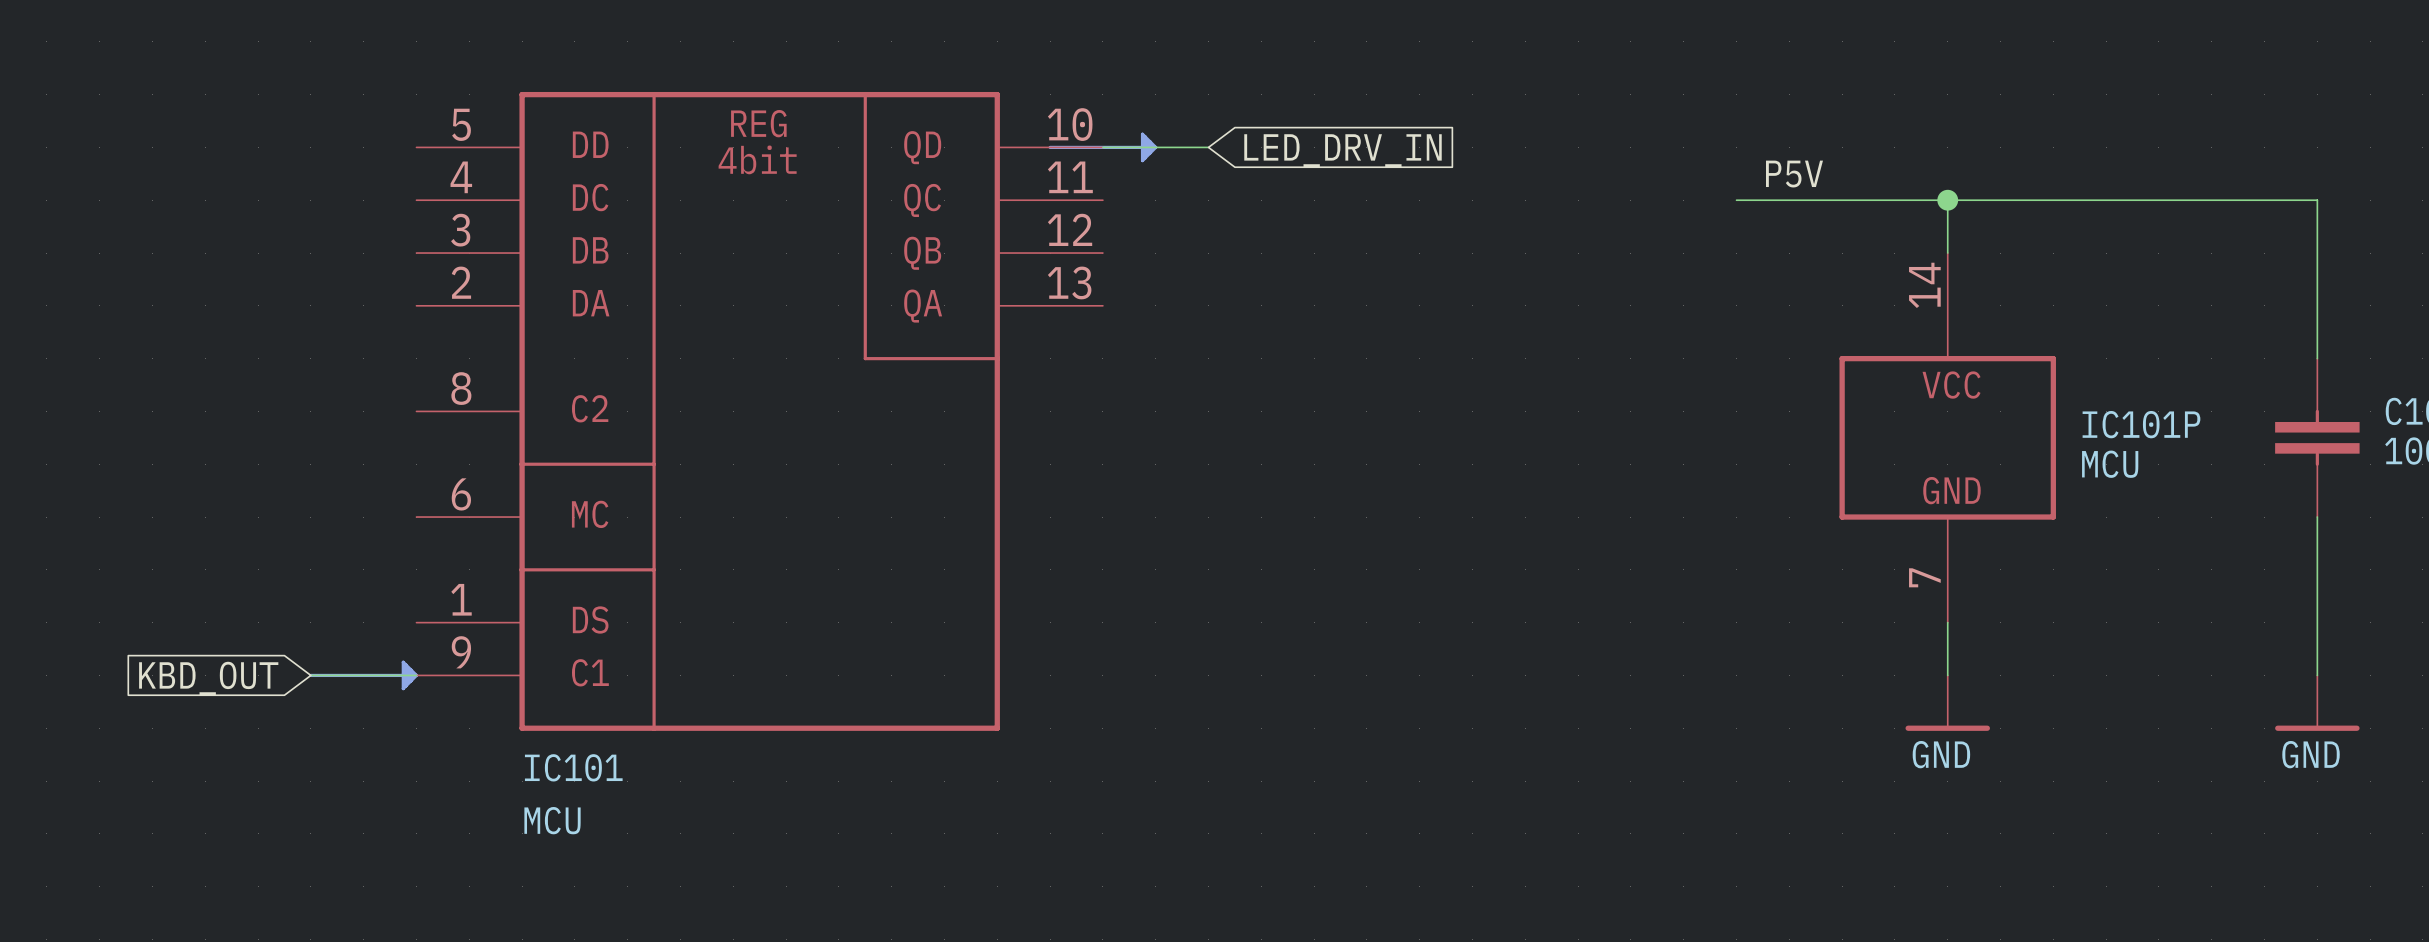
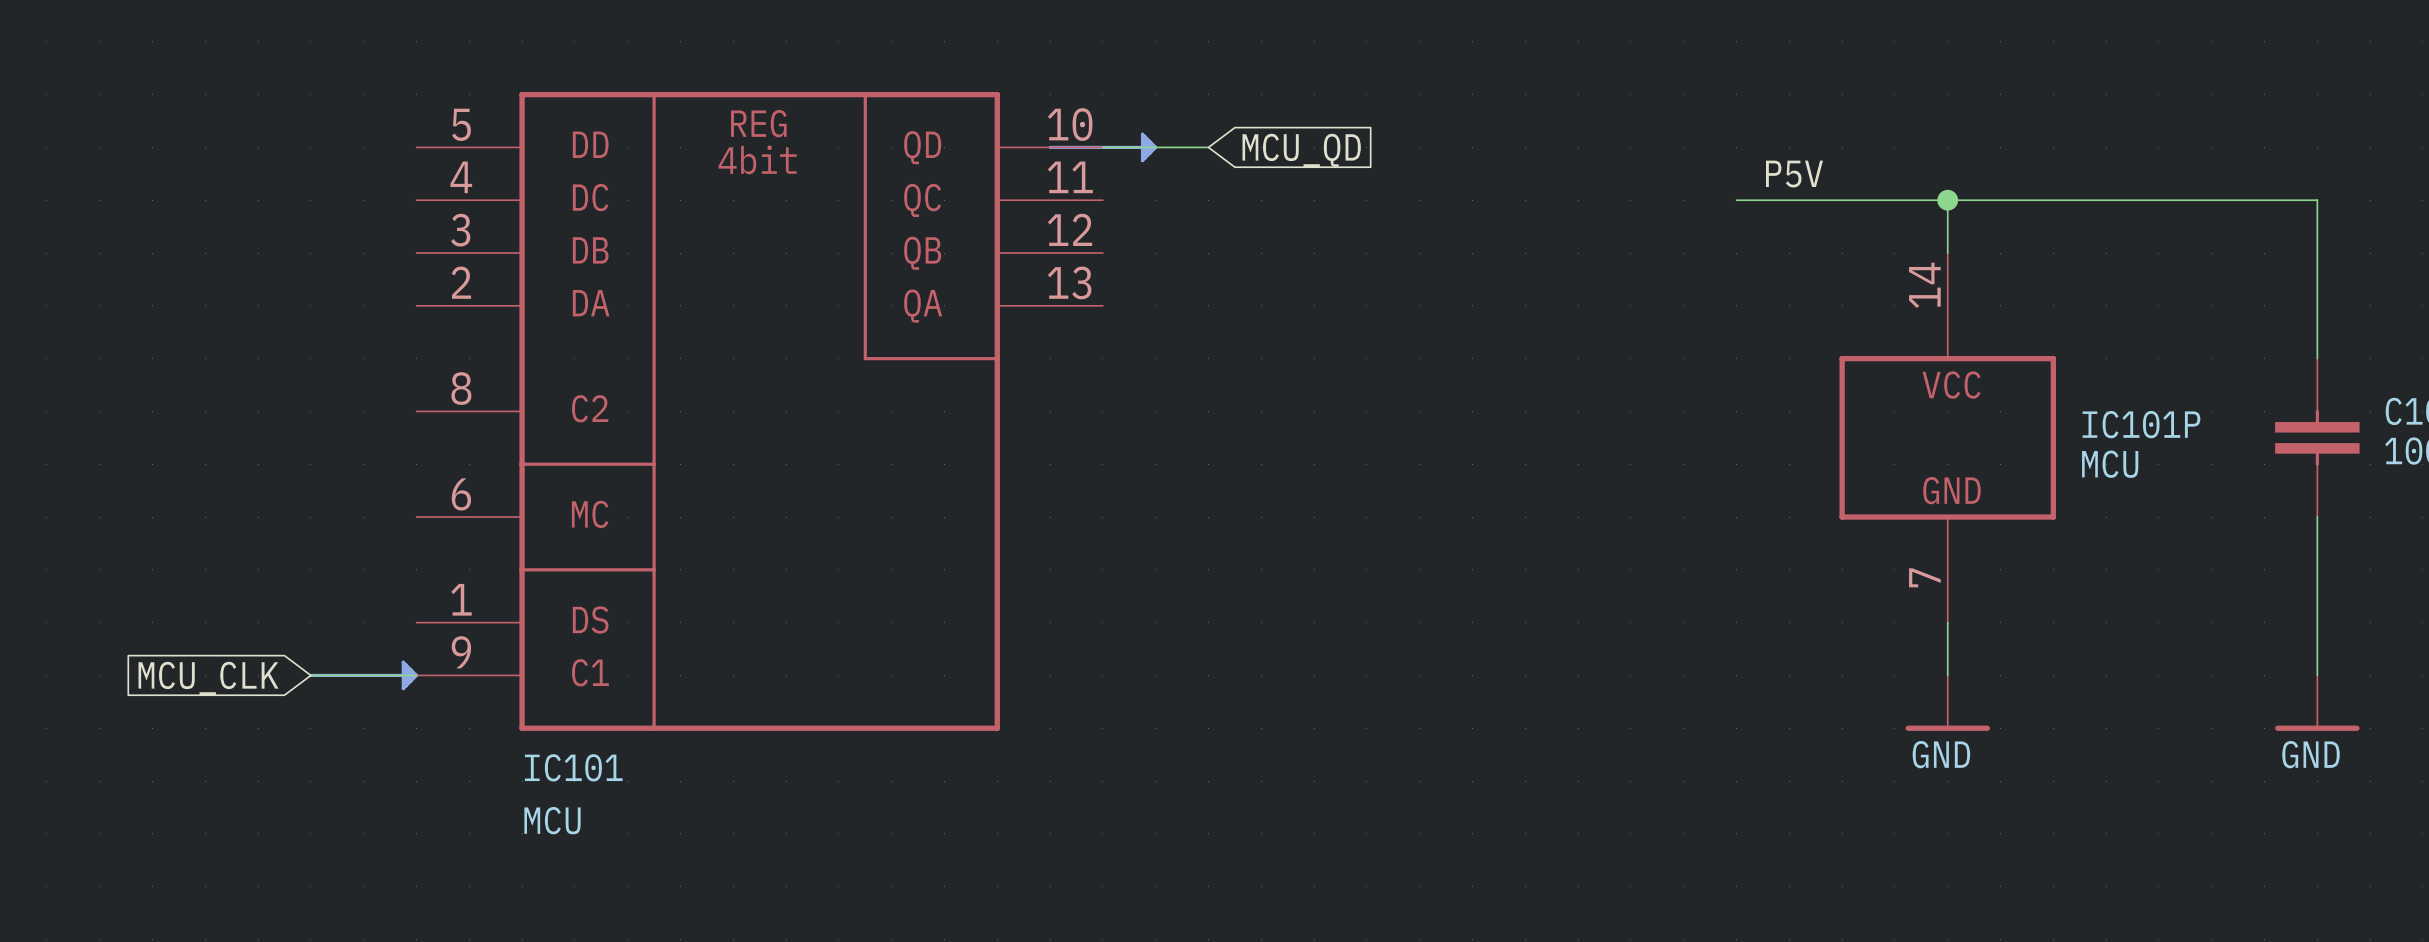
global label: LED_DRV_IN (1343, 150) -> MCU_QD (1301, 150)
global label: KBD_OUT (208, 678) -> MCU_CLK (208, 678)

